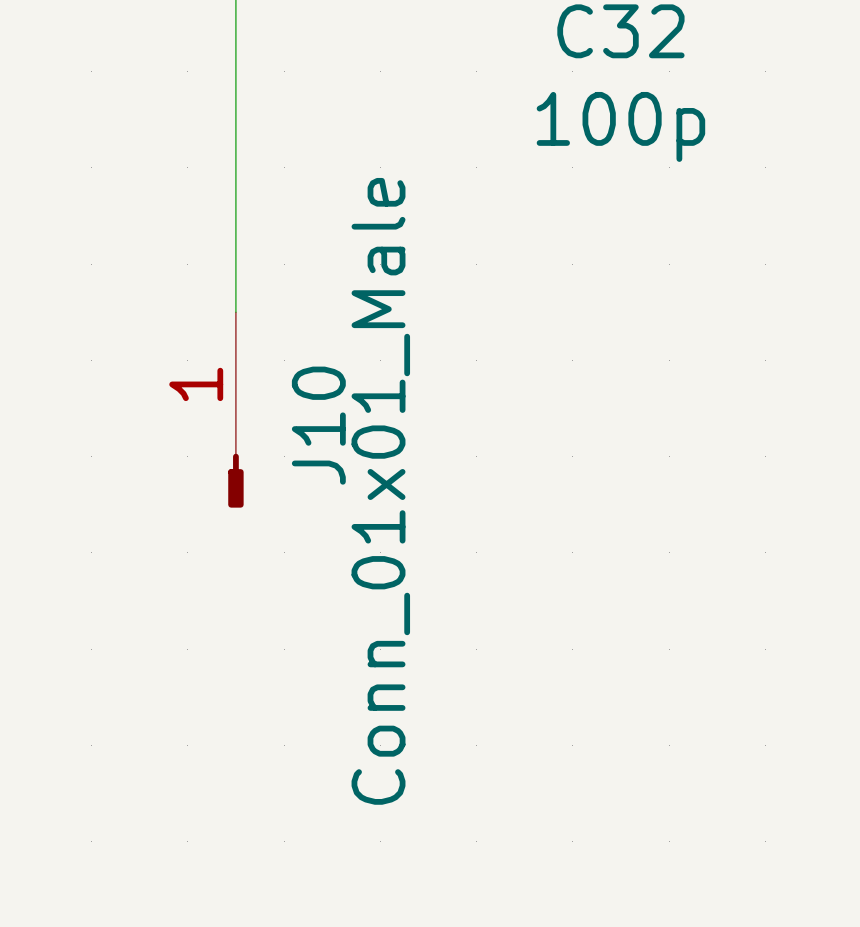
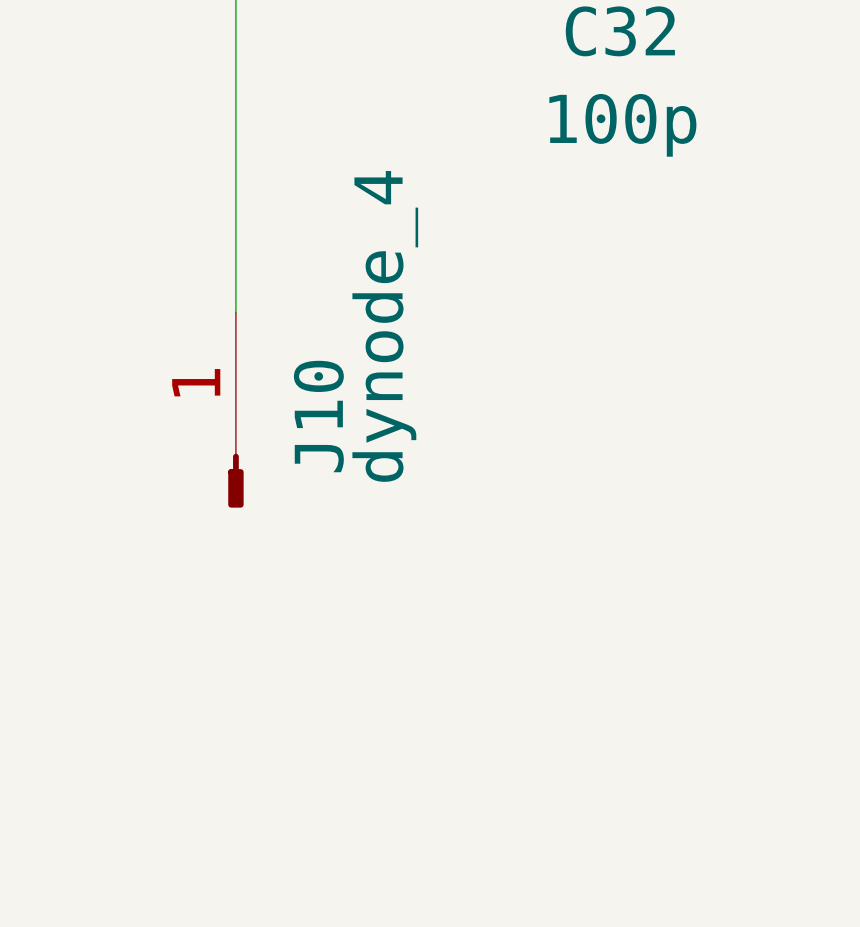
J10 value: Conn_01x01_Male (380, 491) -> dynode_4 (385, 326)

